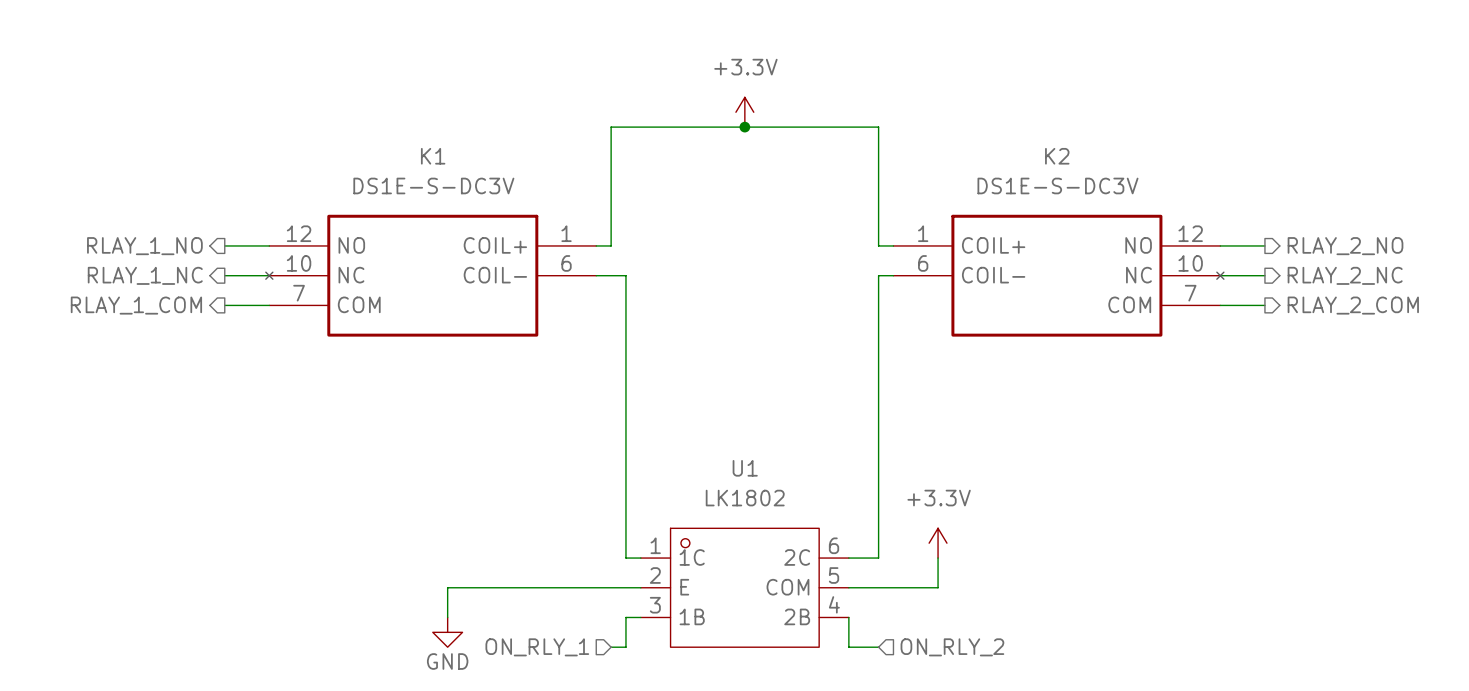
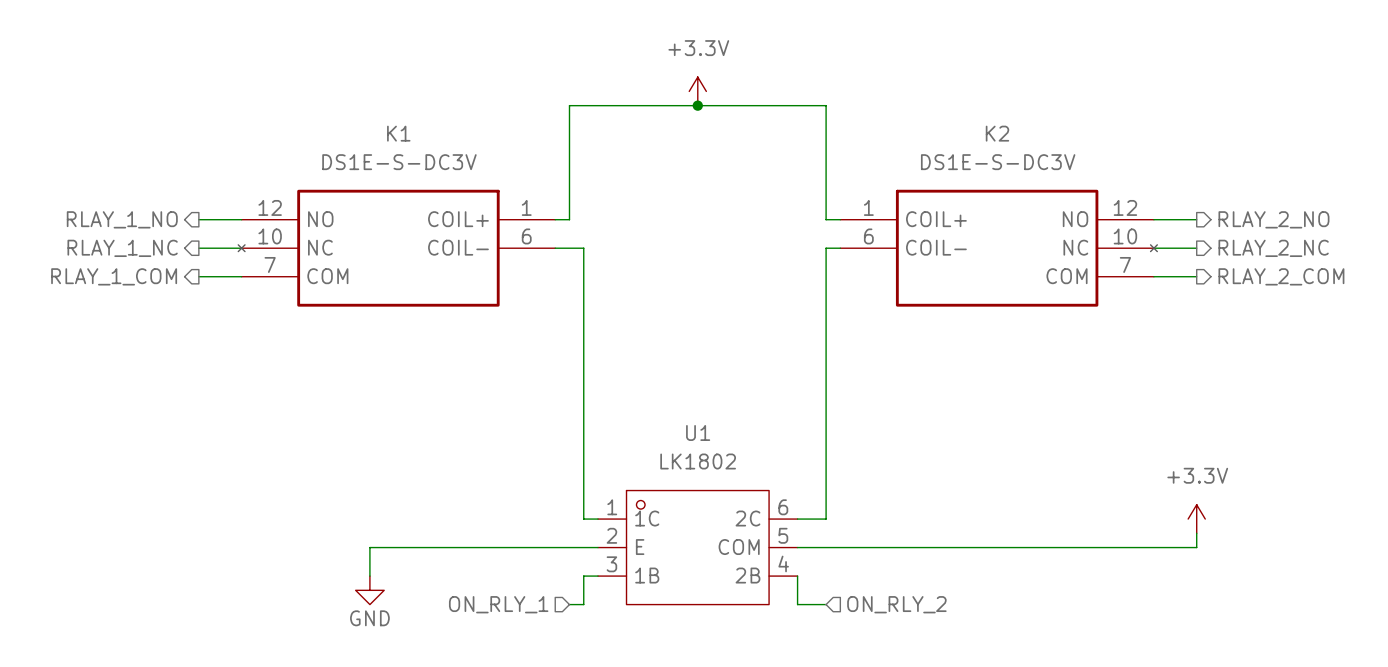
power symbol: +3.3V (938, 543) -> none
wire: (938, 558) (938, 587) -> (1196, 533) (1196, 547) (883, 547)
power symbol: none -> +3.3V (1196, 519)
wire: (447, 587) (447, 617) -> (412, 547) (369, 547) (369, 576)
power symbol position: GND (447, 632) -> GND (369, 590)

